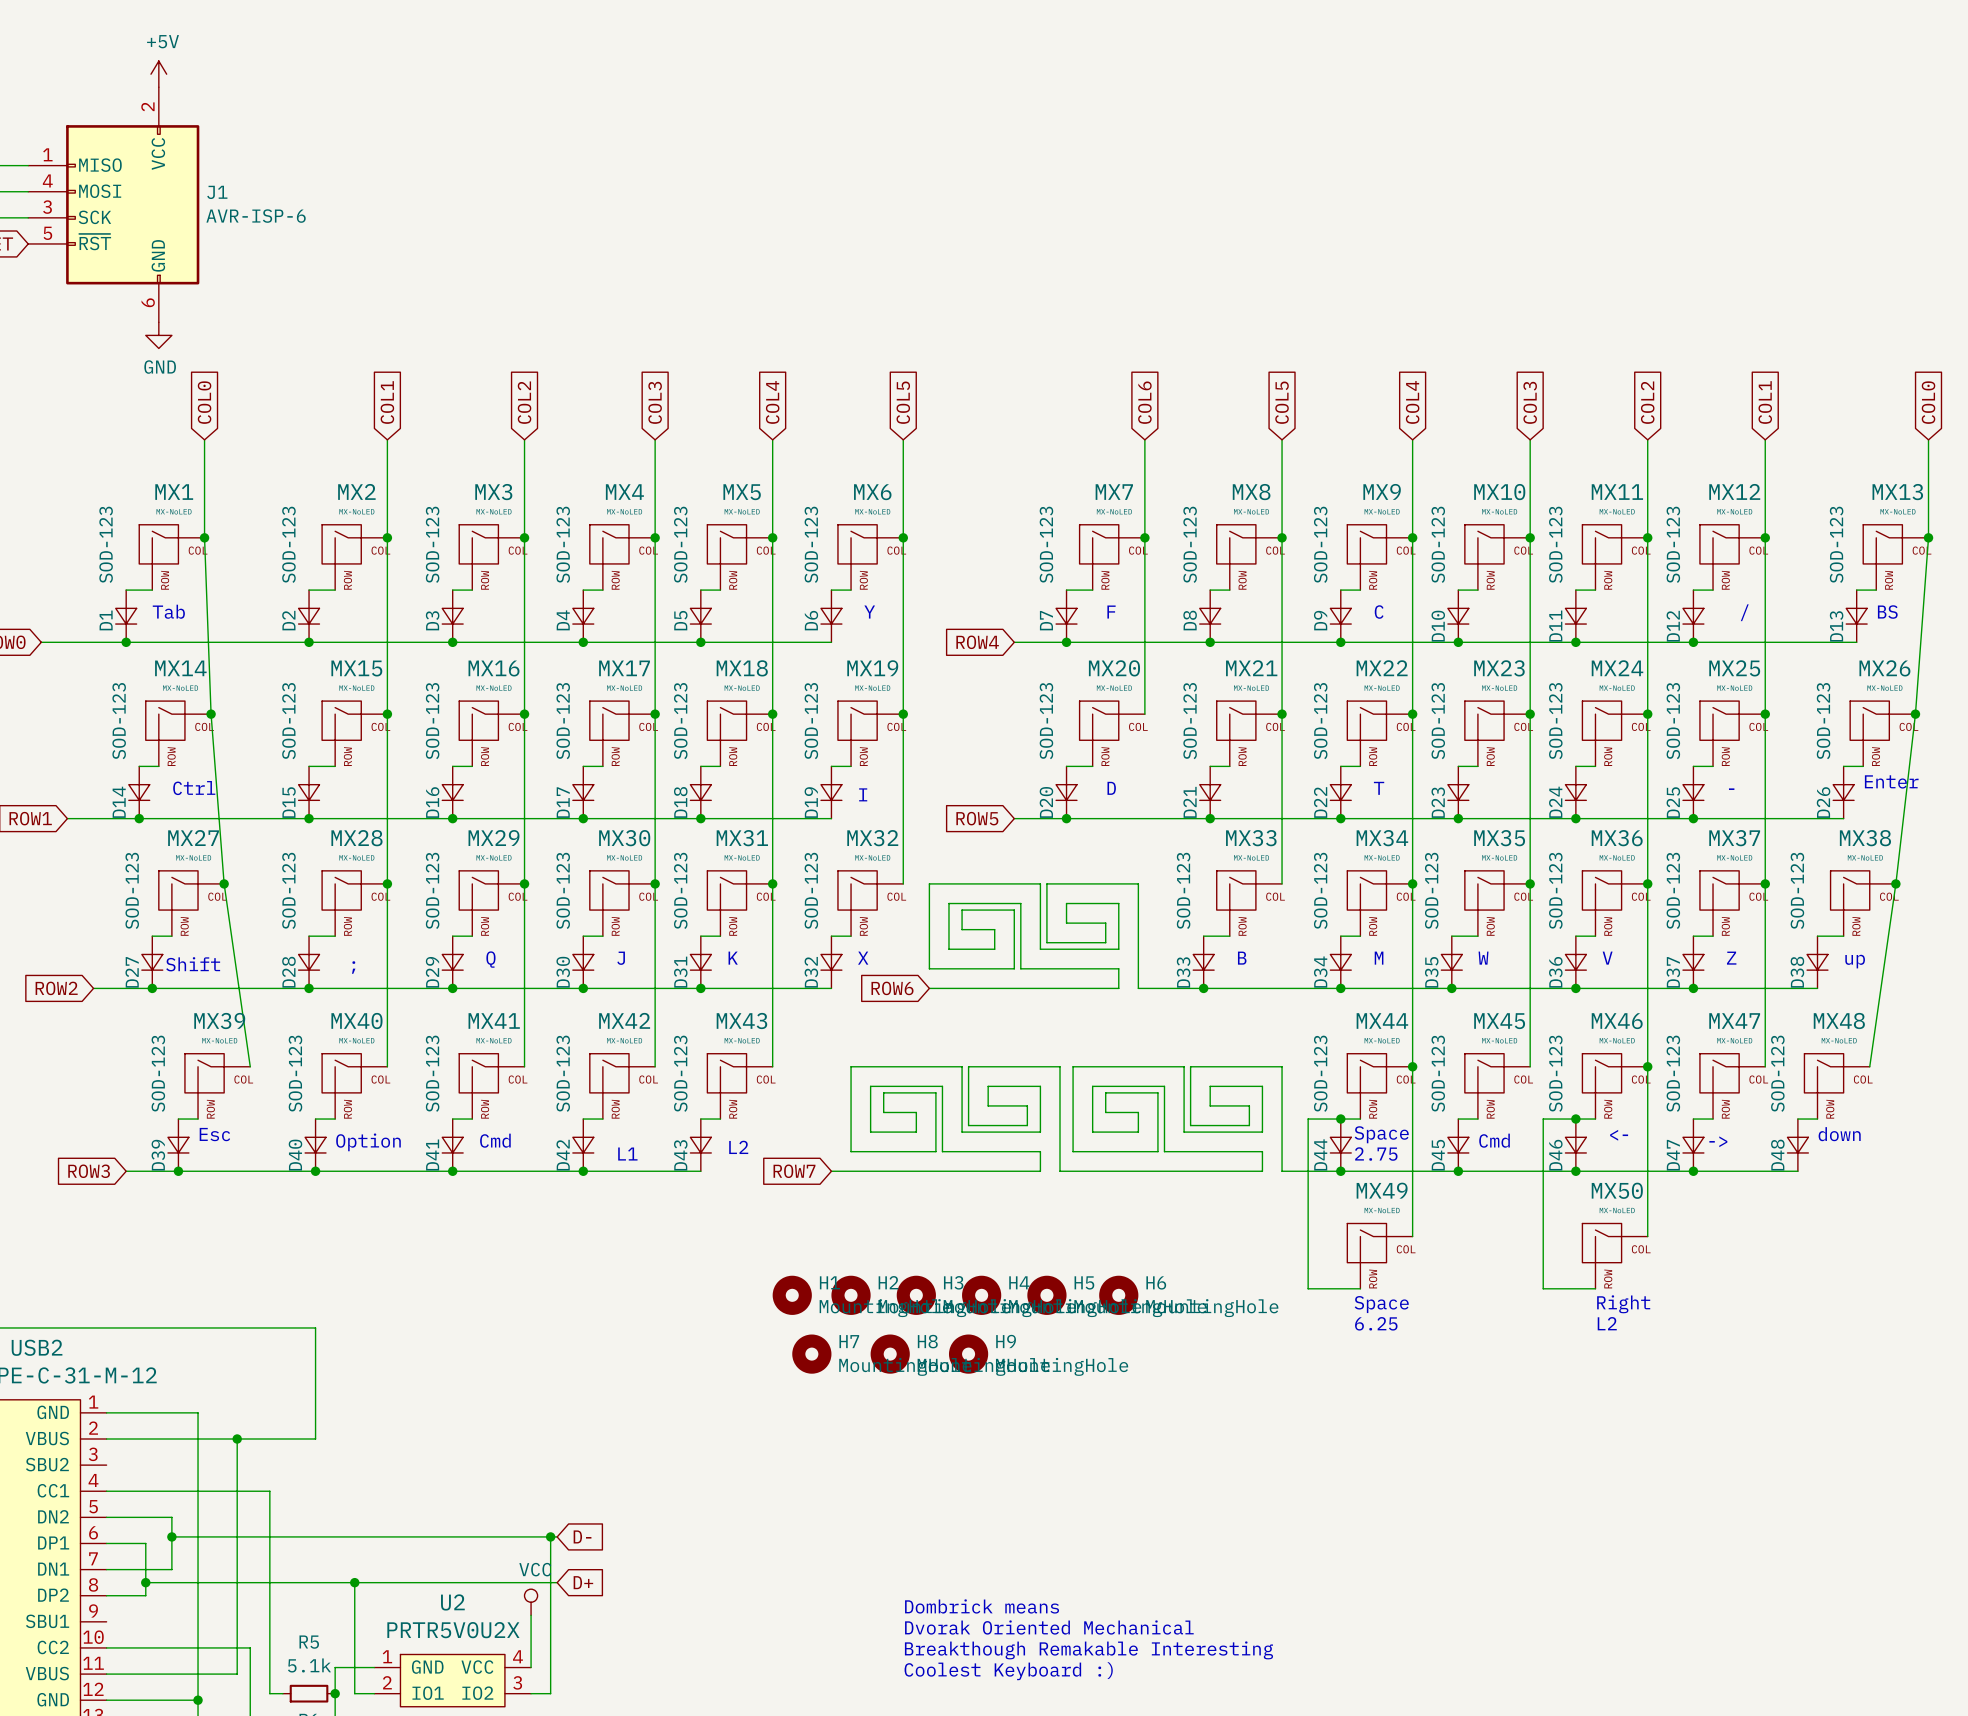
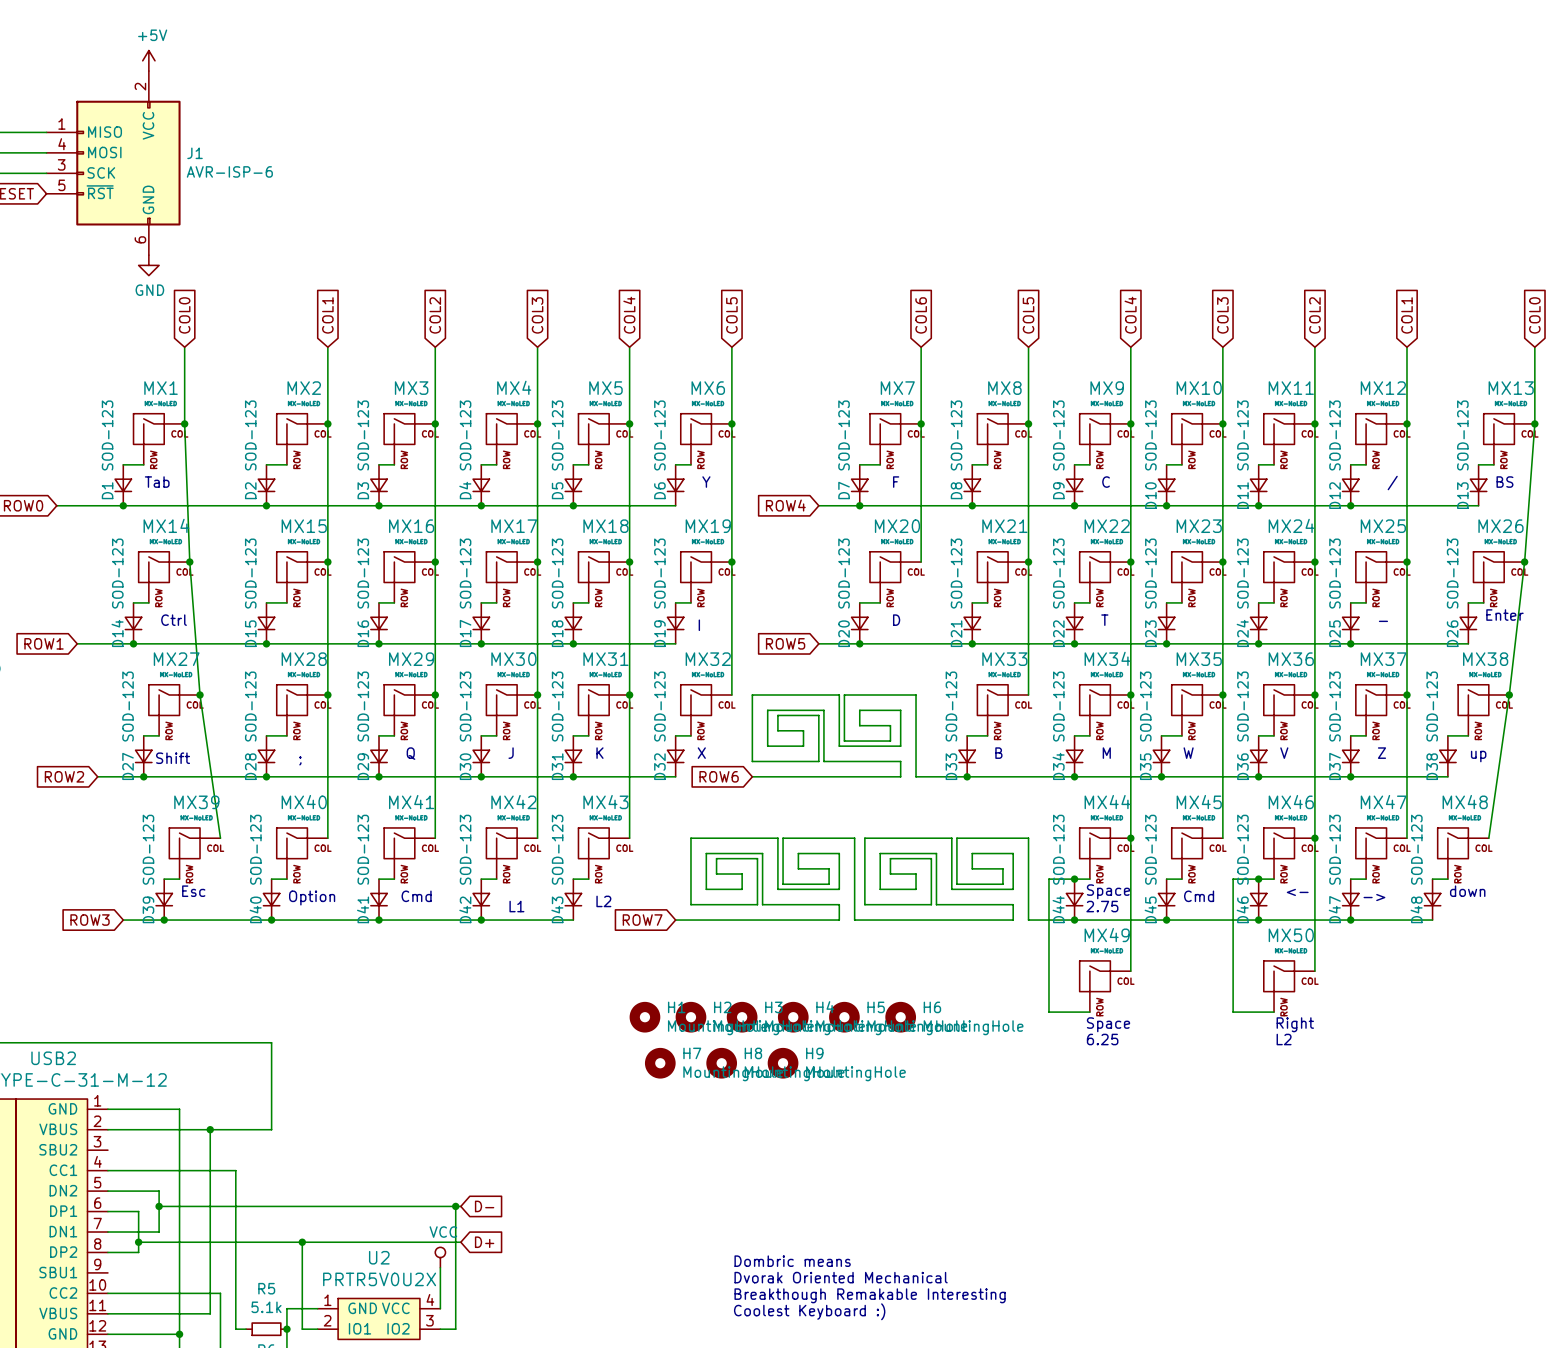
text: Dombrick means (982, 1606) -> Dombric means (792, 1261)

